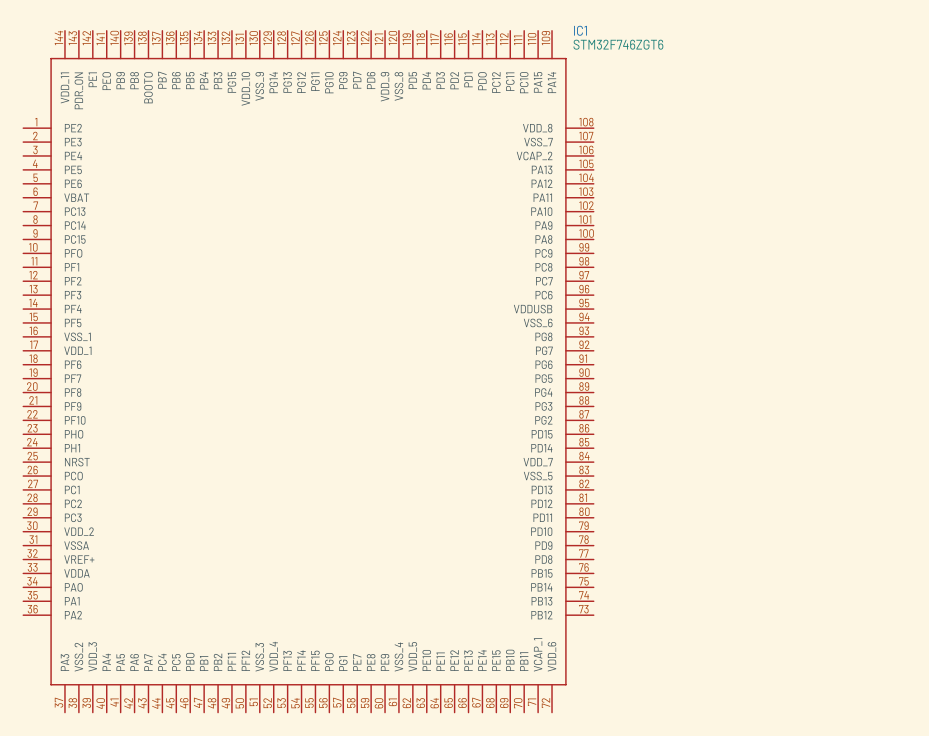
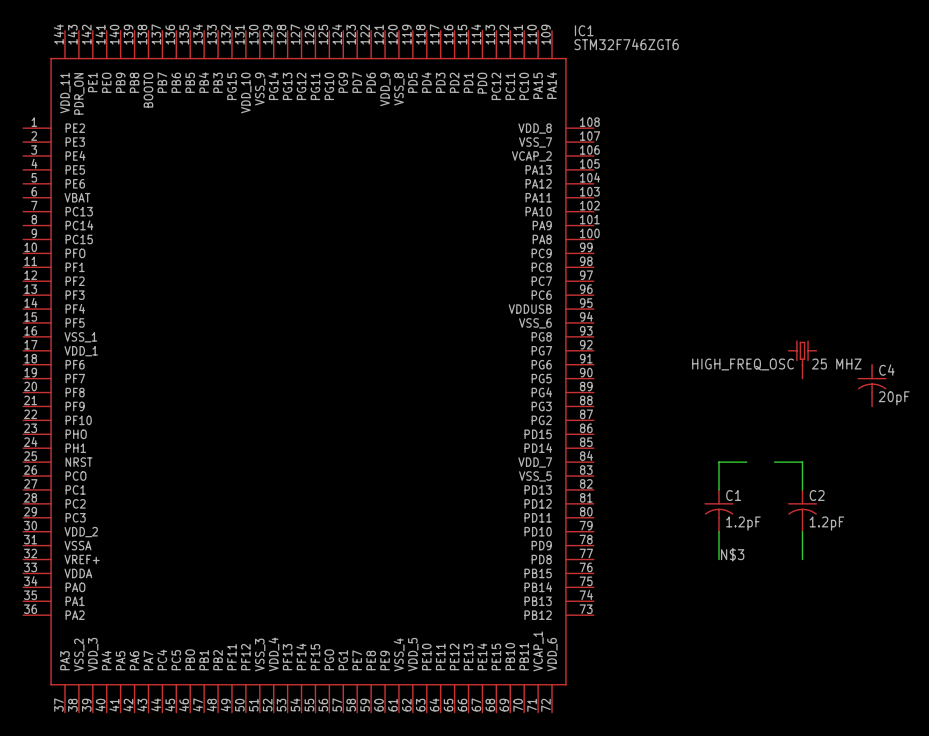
HIGH_FREQ_OSC: none -> 25 MHZ (802, 359)
C4: none -> 20pF (872, 385)
wire: none -> (746, 462) (718, 462) (718, 489)
wire: none -> (774, 462) (802, 462) (802, 489)
C1: none -> 1.2pF (718, 510)
C2: none -> 1.2pF (802, 510)
wire: none -> (718, 531) (718, 559)
wire: none -> (802, 531) (802, 559)
label: none -> N$3 (732, 554)

